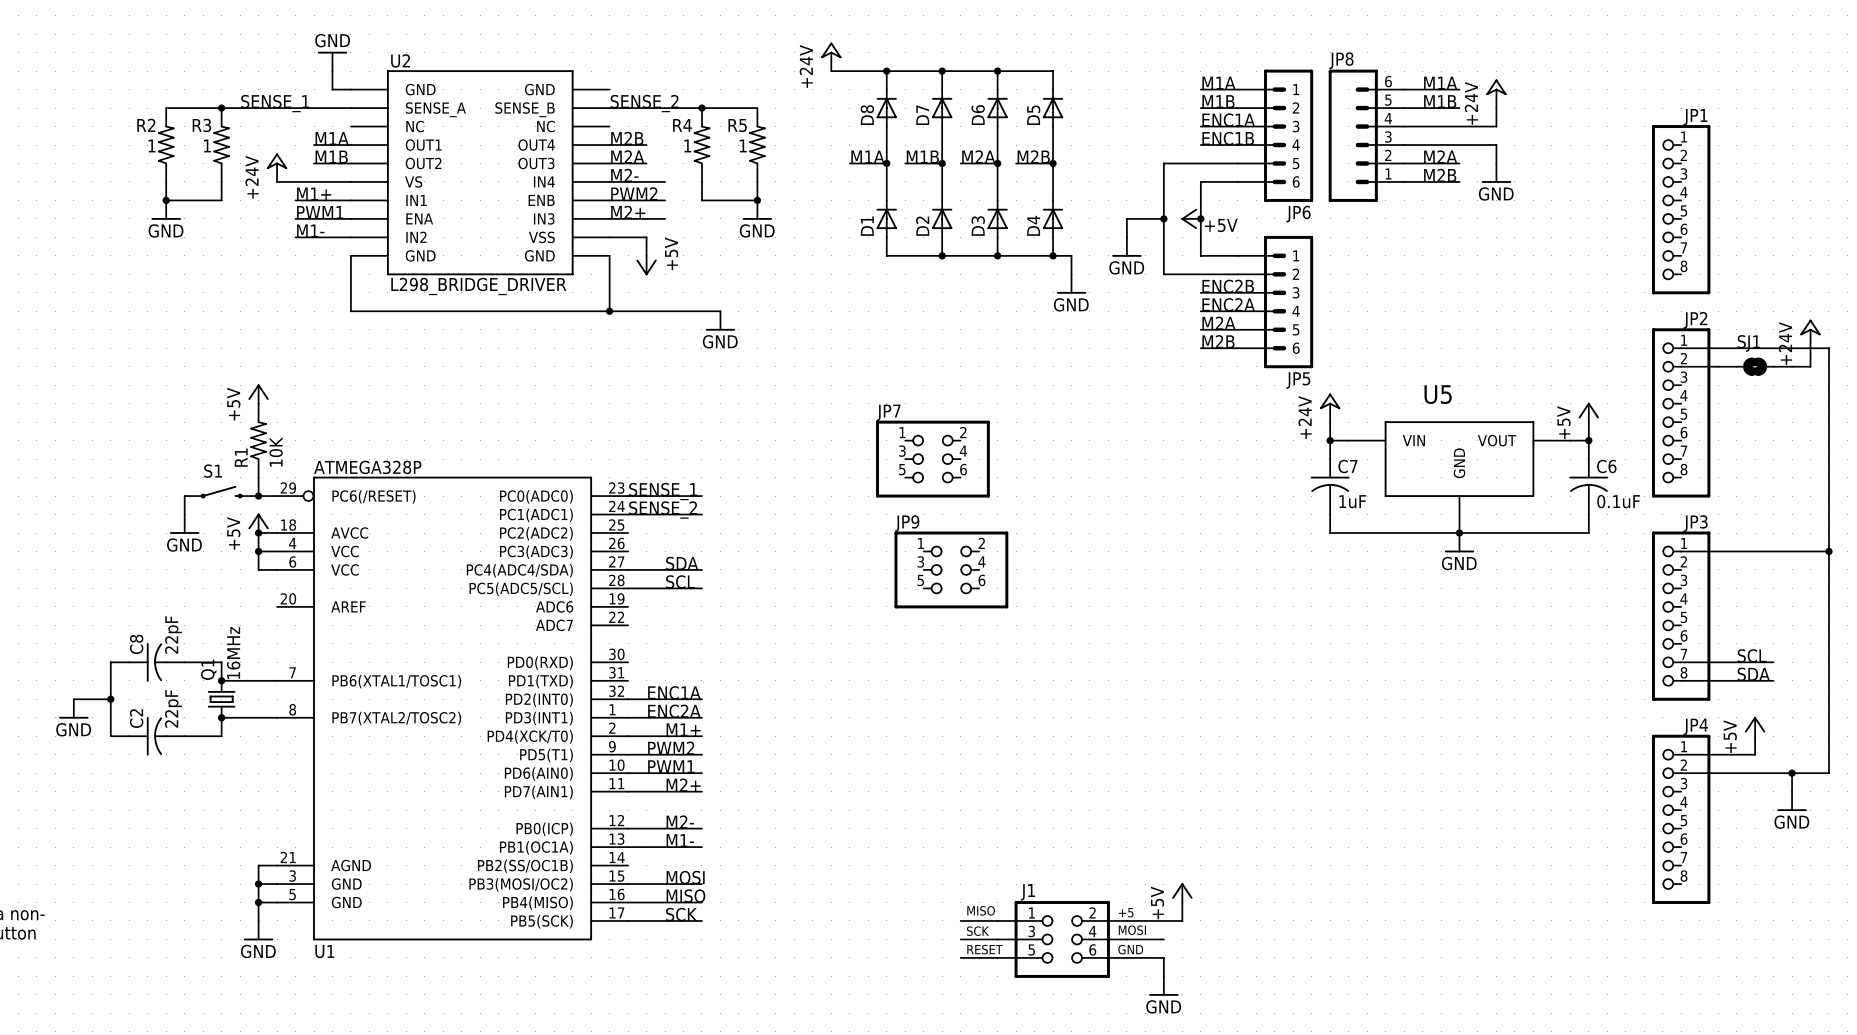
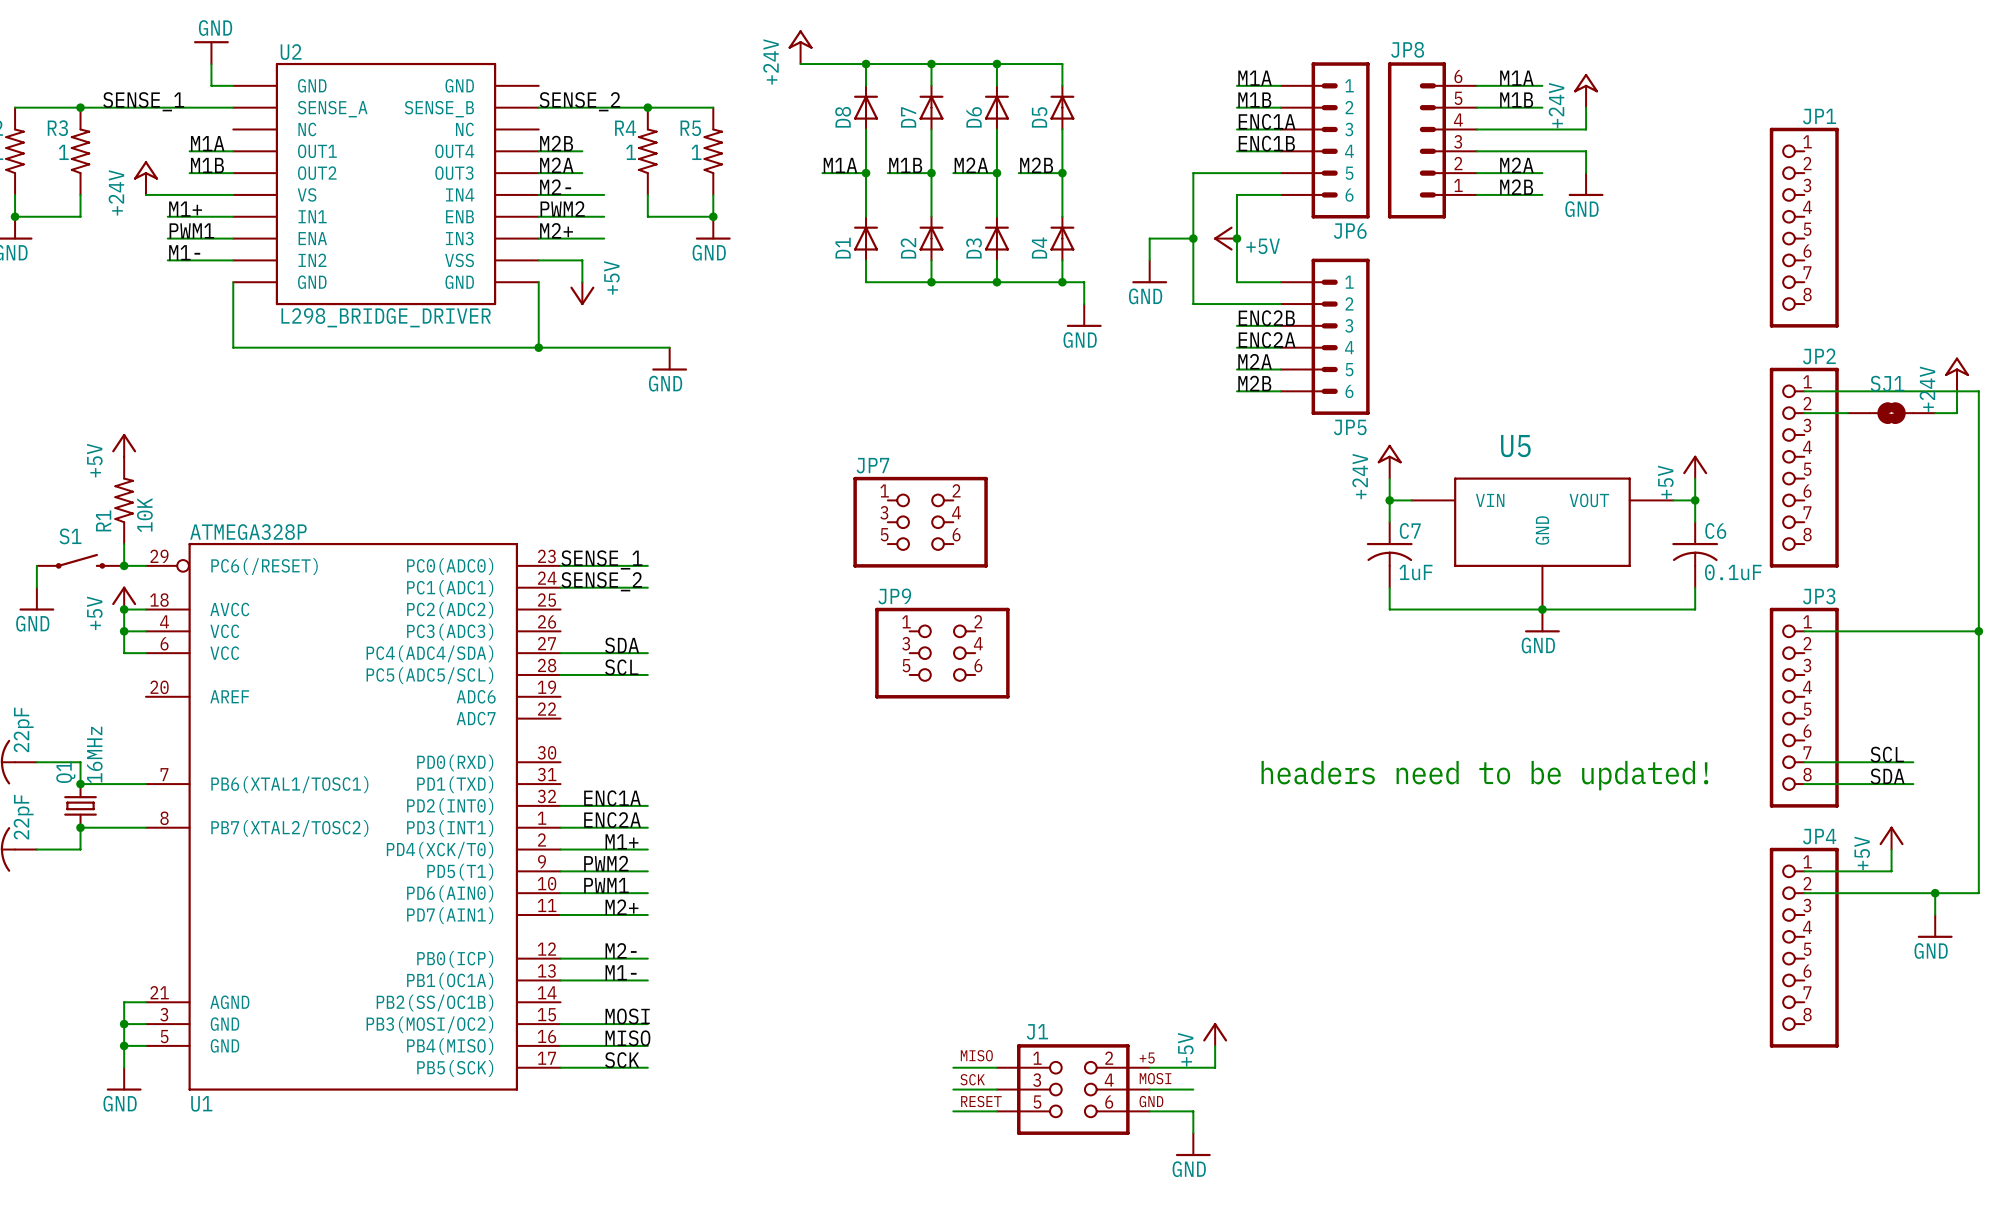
text: none -> headers need to be updated! (1484, 775)

